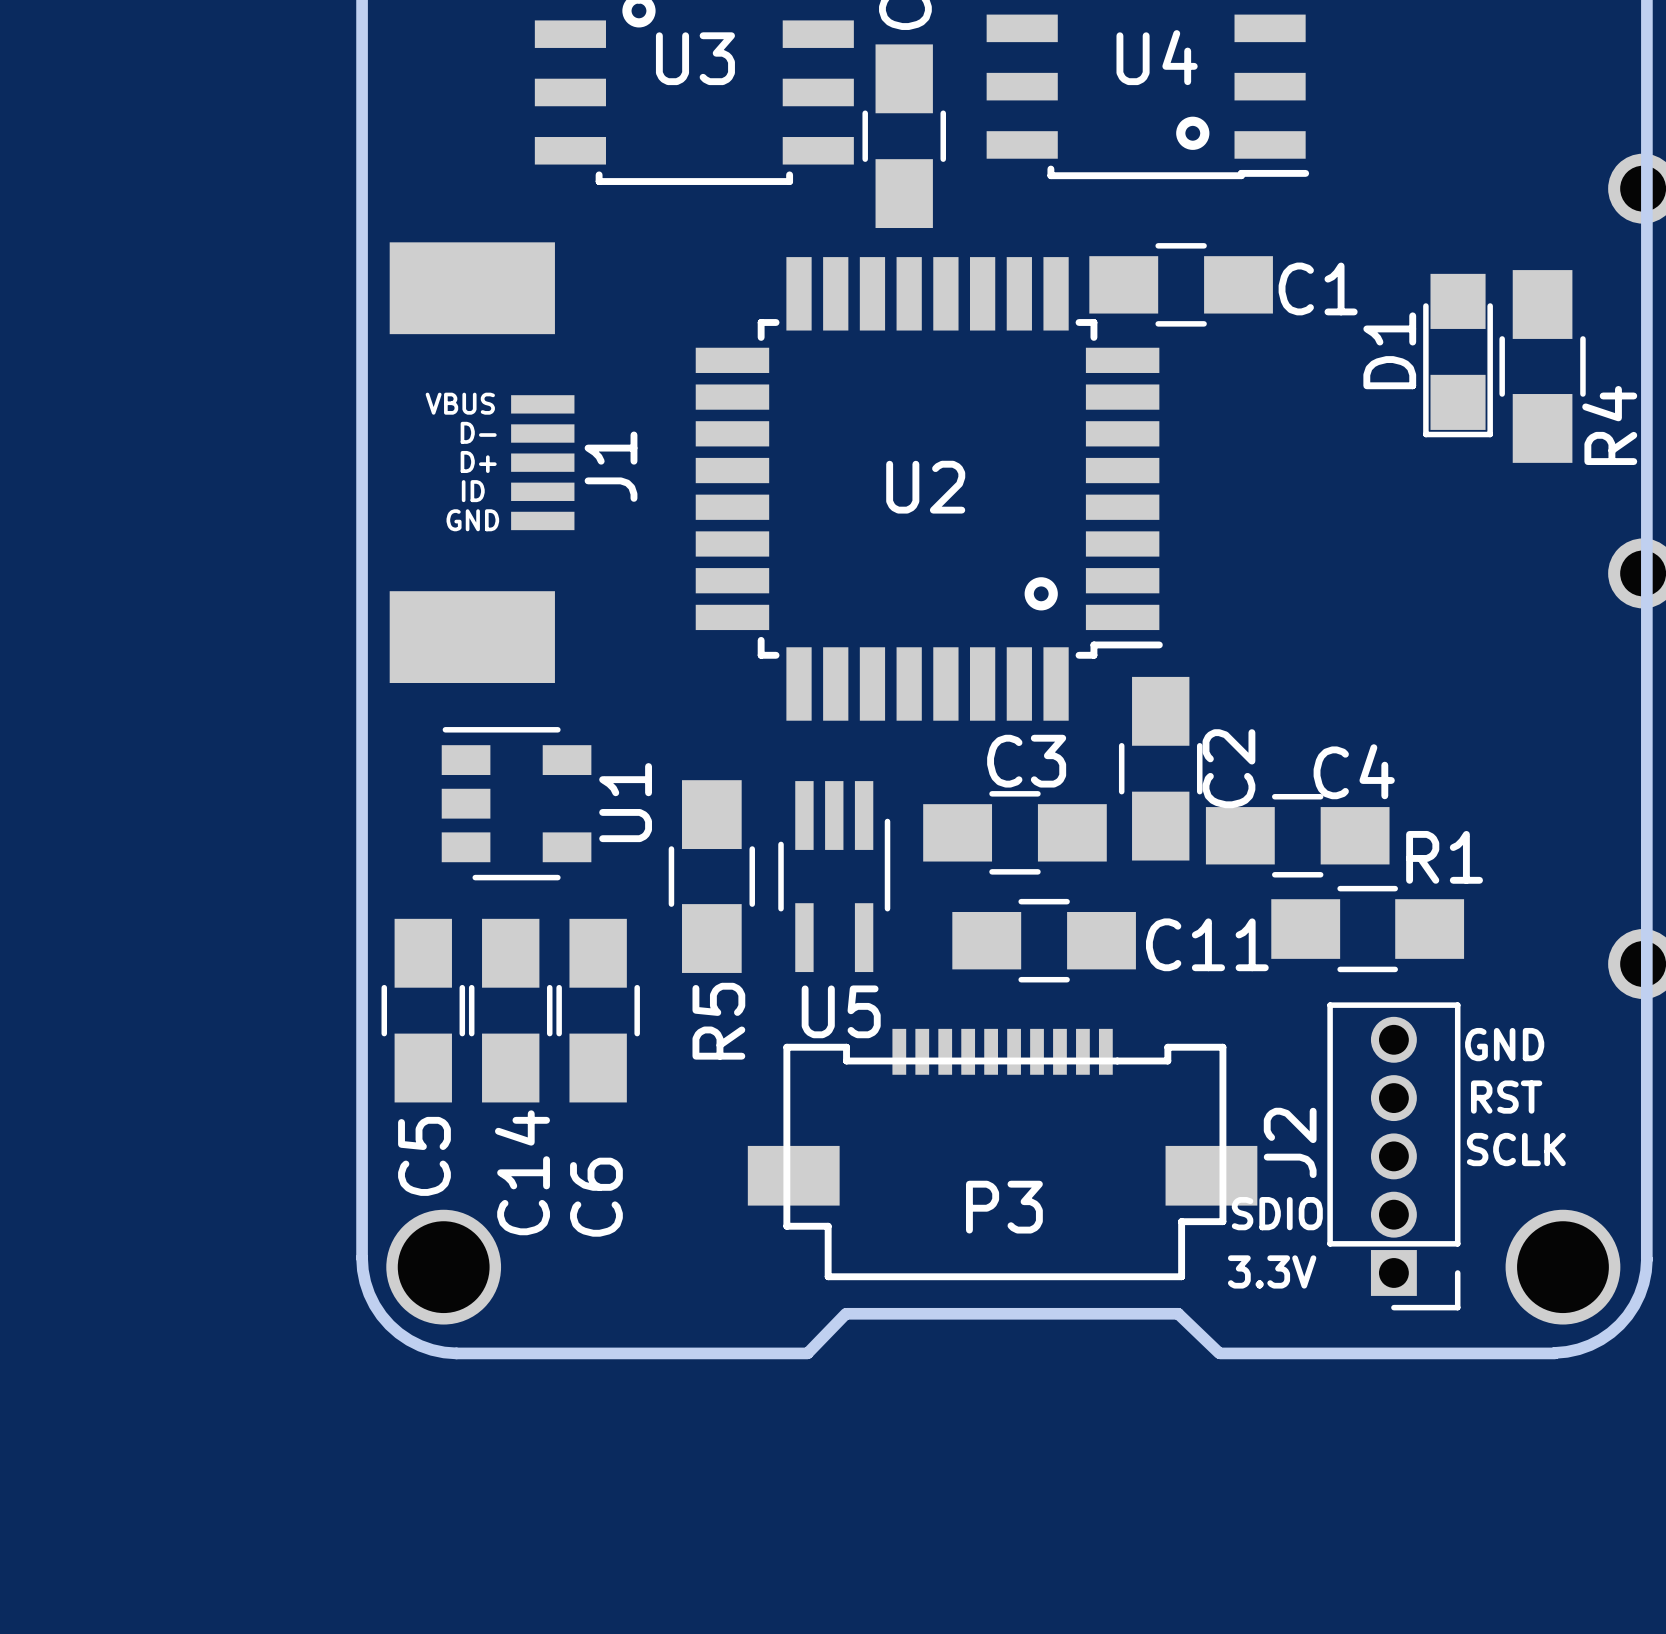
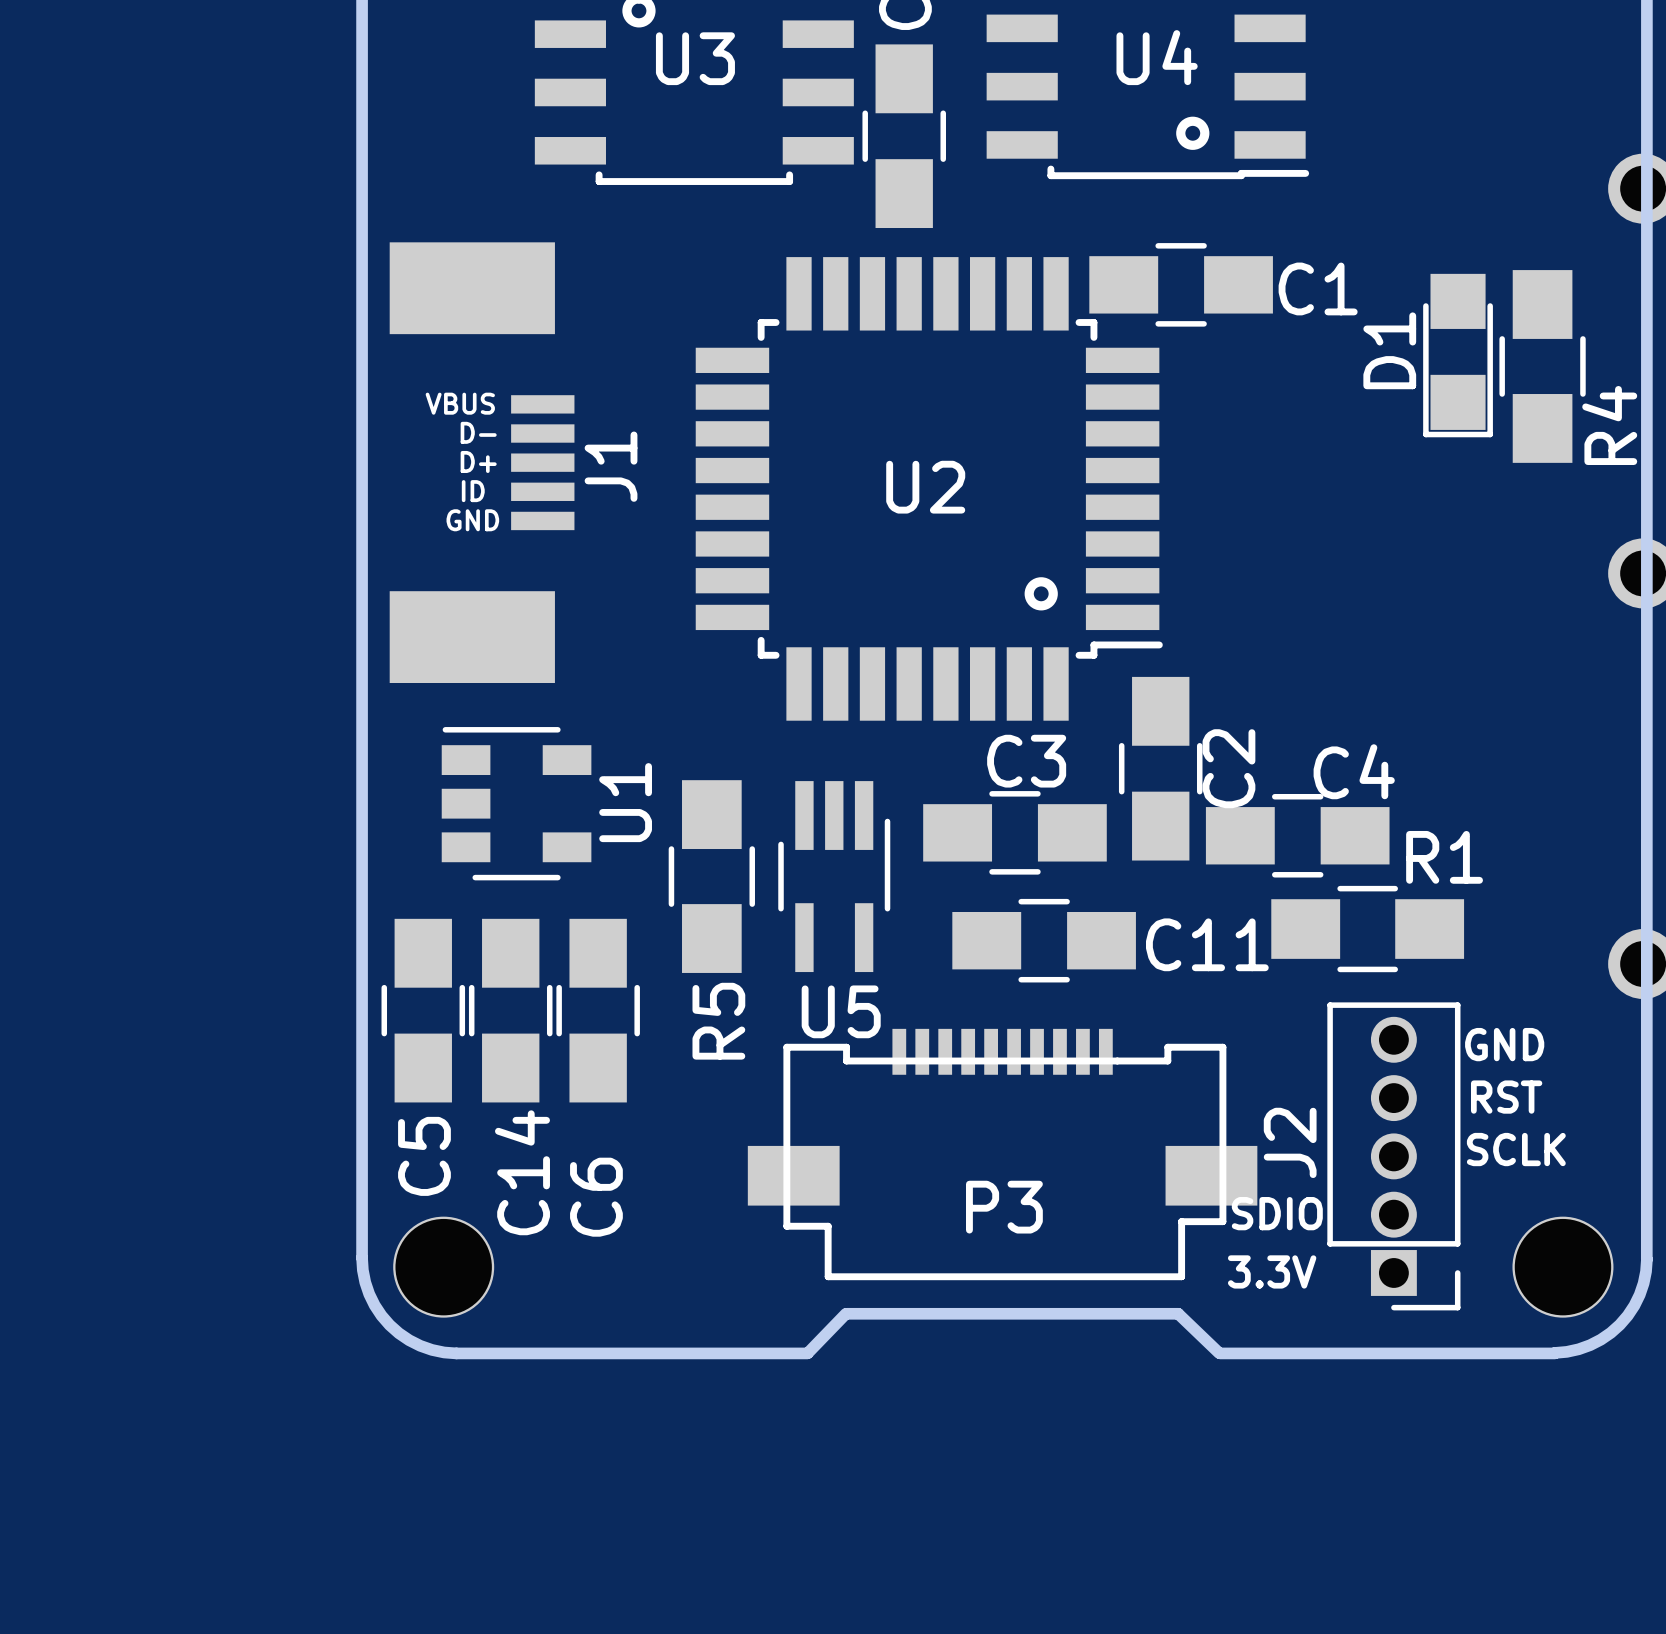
part footprint: [386, 1209, 502, 1325] -> [393, 1216, 495, 1318]
part footprint: [1505, 1209, 1621, 1325] -> [1512, 1216, 1614, 1318]

